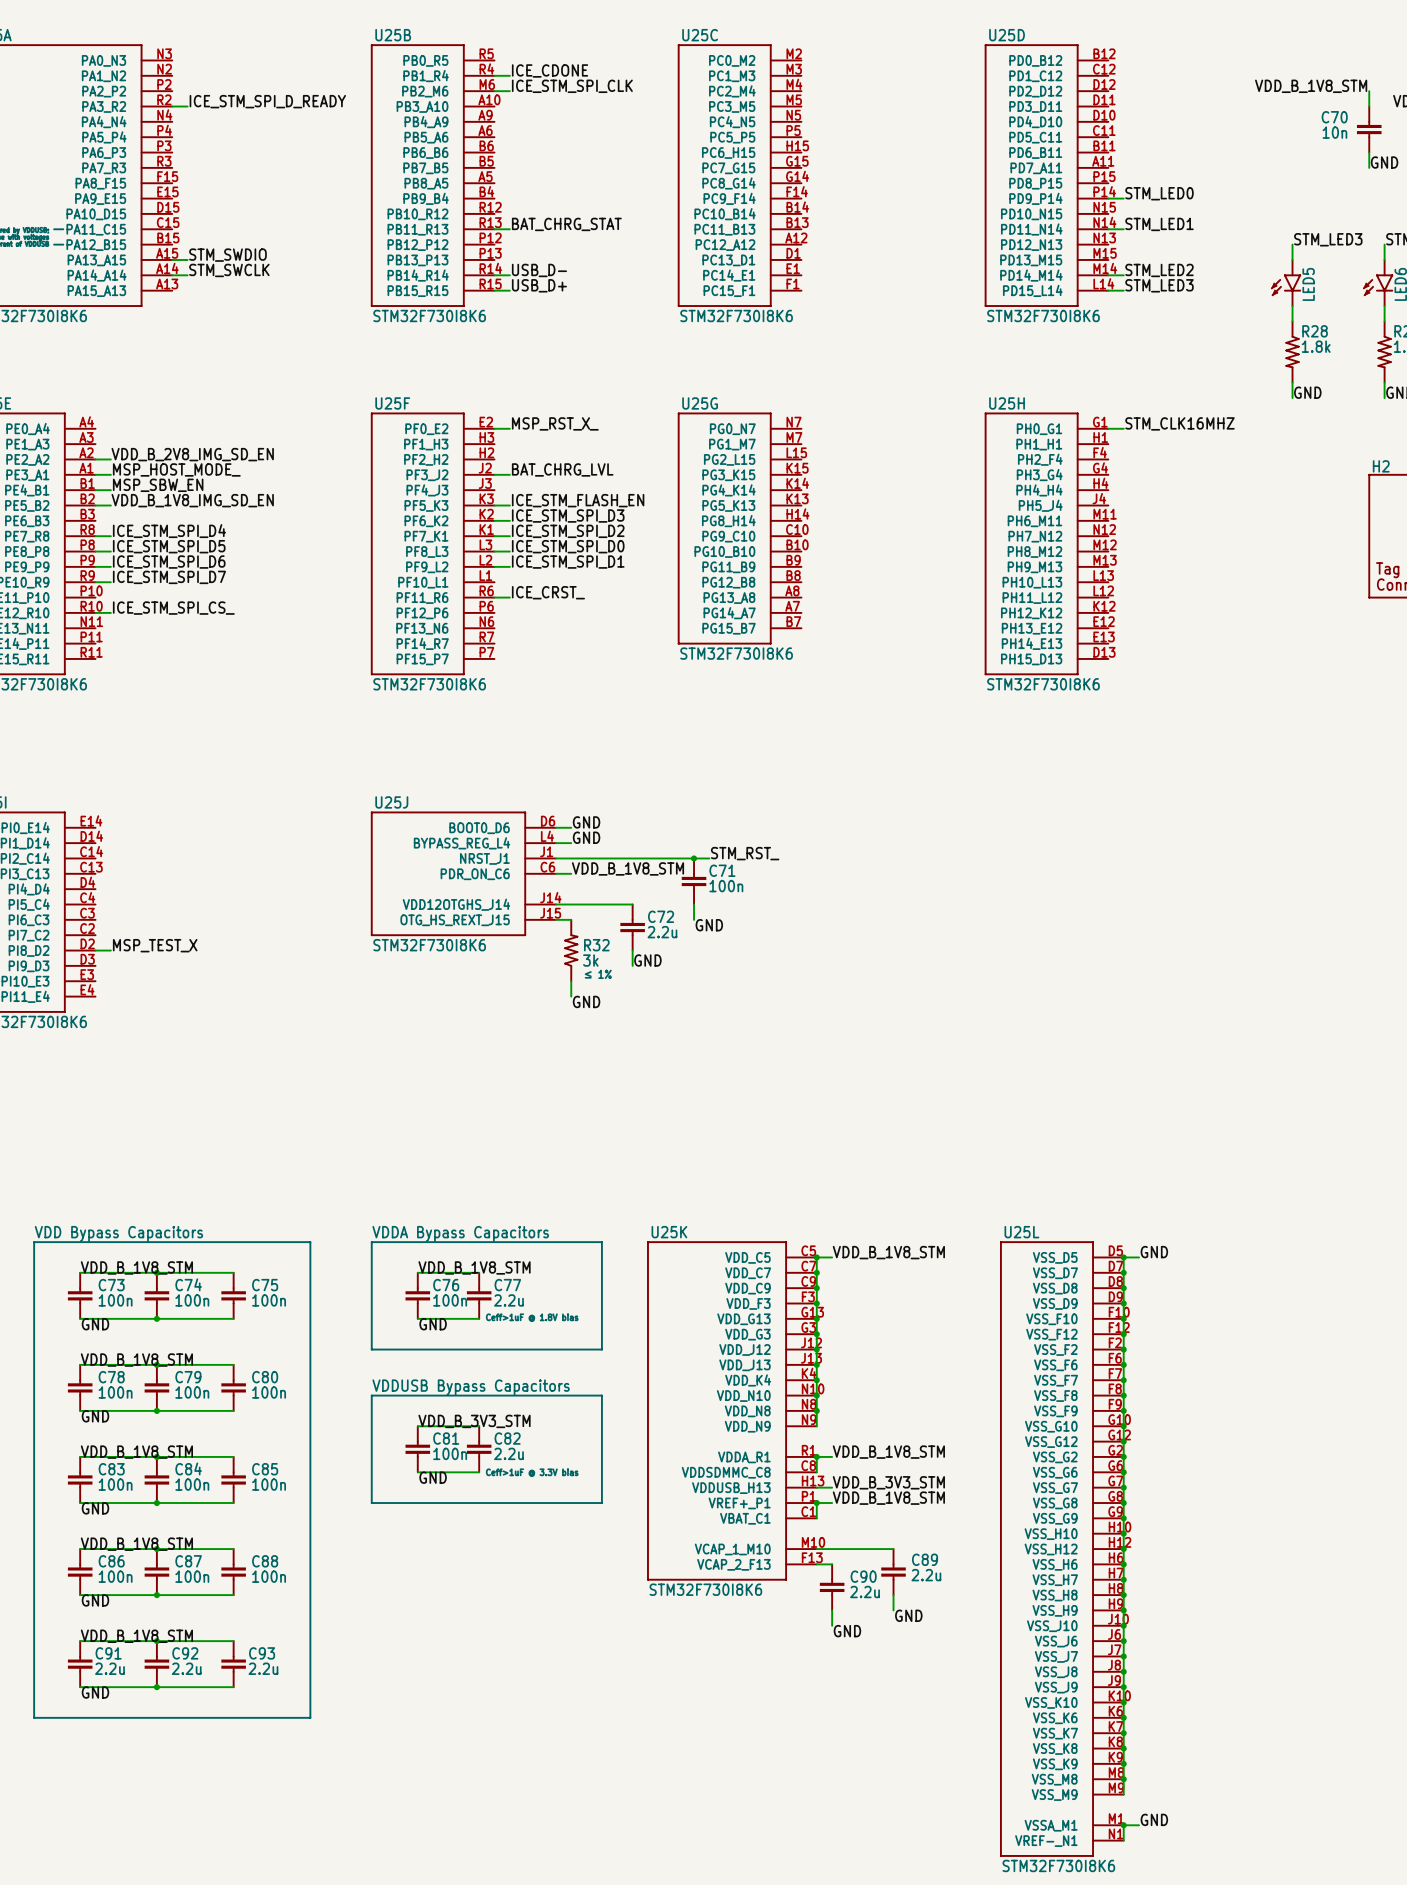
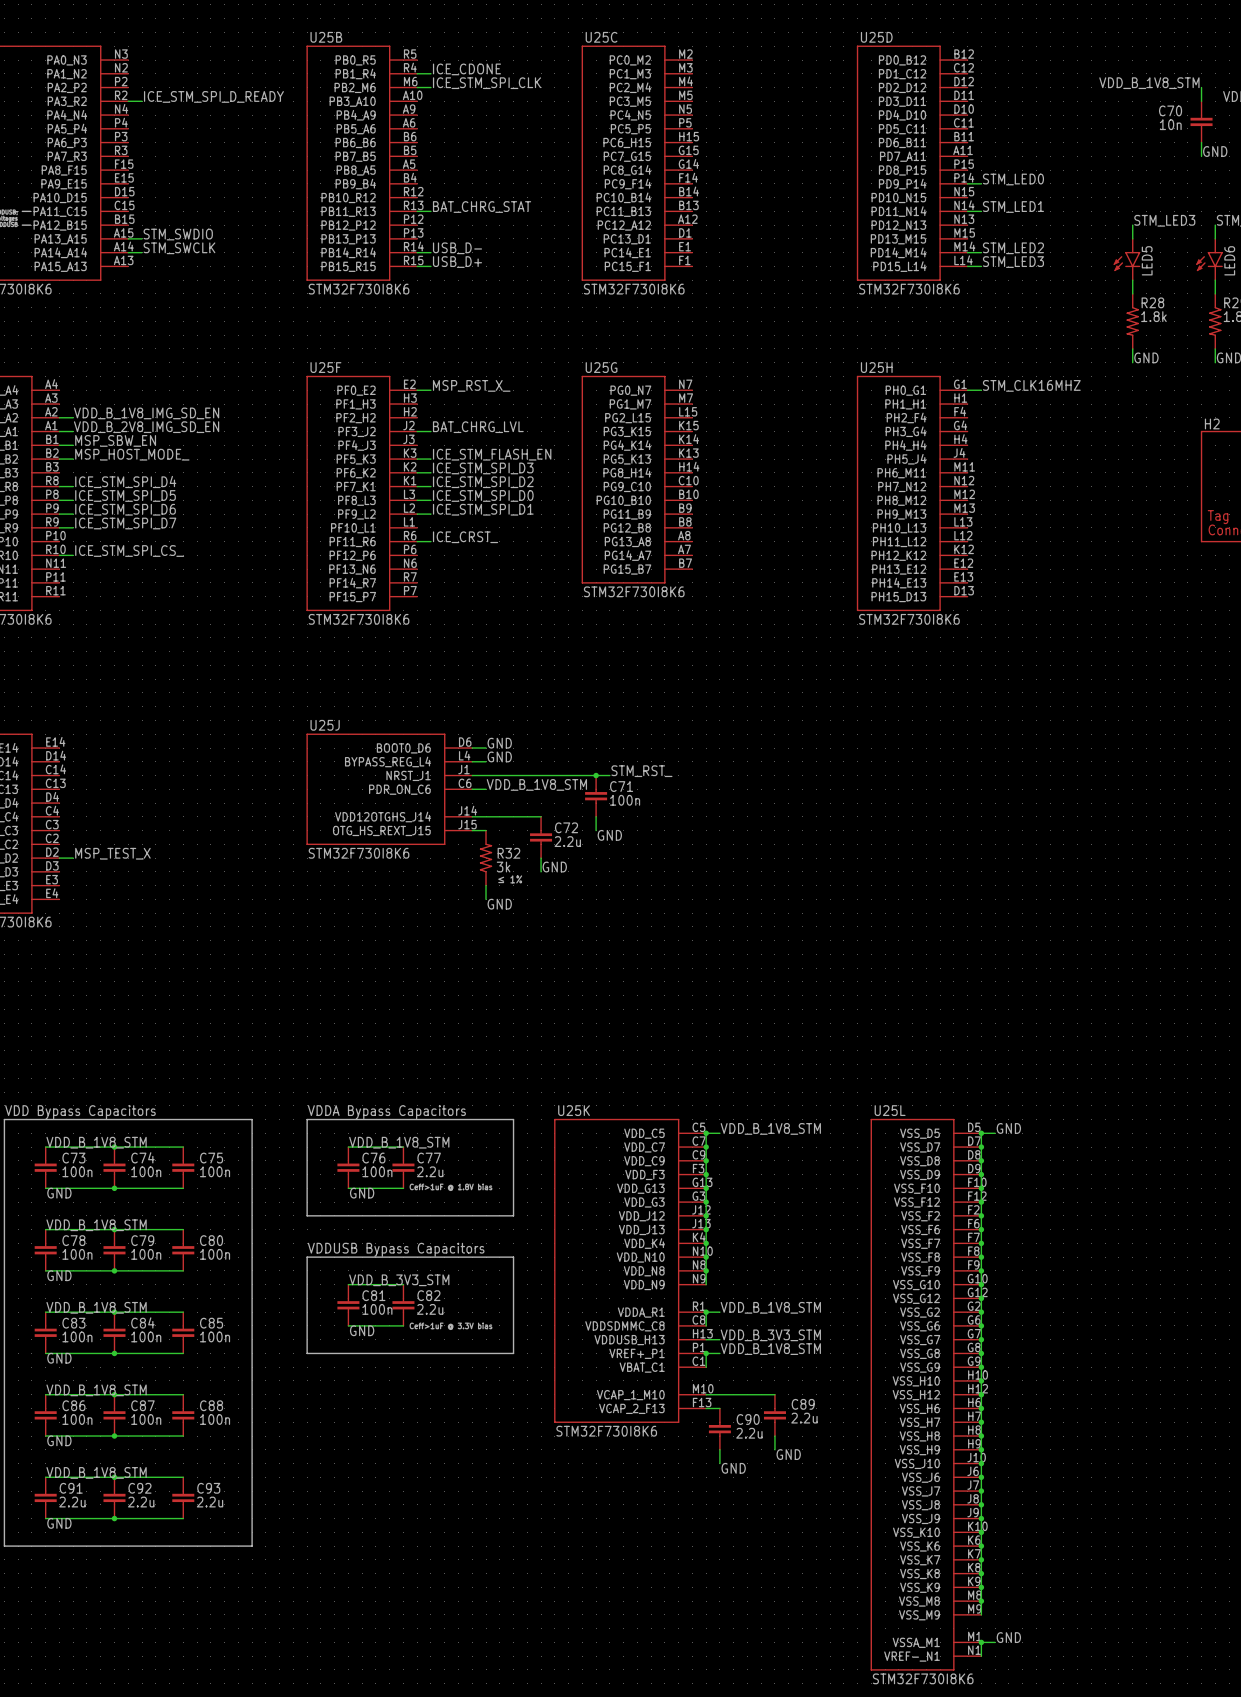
label: VDD_B_2V8_IMG_SD_EN (192, 454) -> VDD_B_1V8_IMG_SD_EN (146, 413)
label: MSP_HOST_MODE_ (176, 469) -> VDD_B_2V8_IMG_SD_EN (146, 427)
label: VDD_B_1V8_IMG_SD_EN (192, 500) -> MSP_HOST_MODE_ (132, 454)

